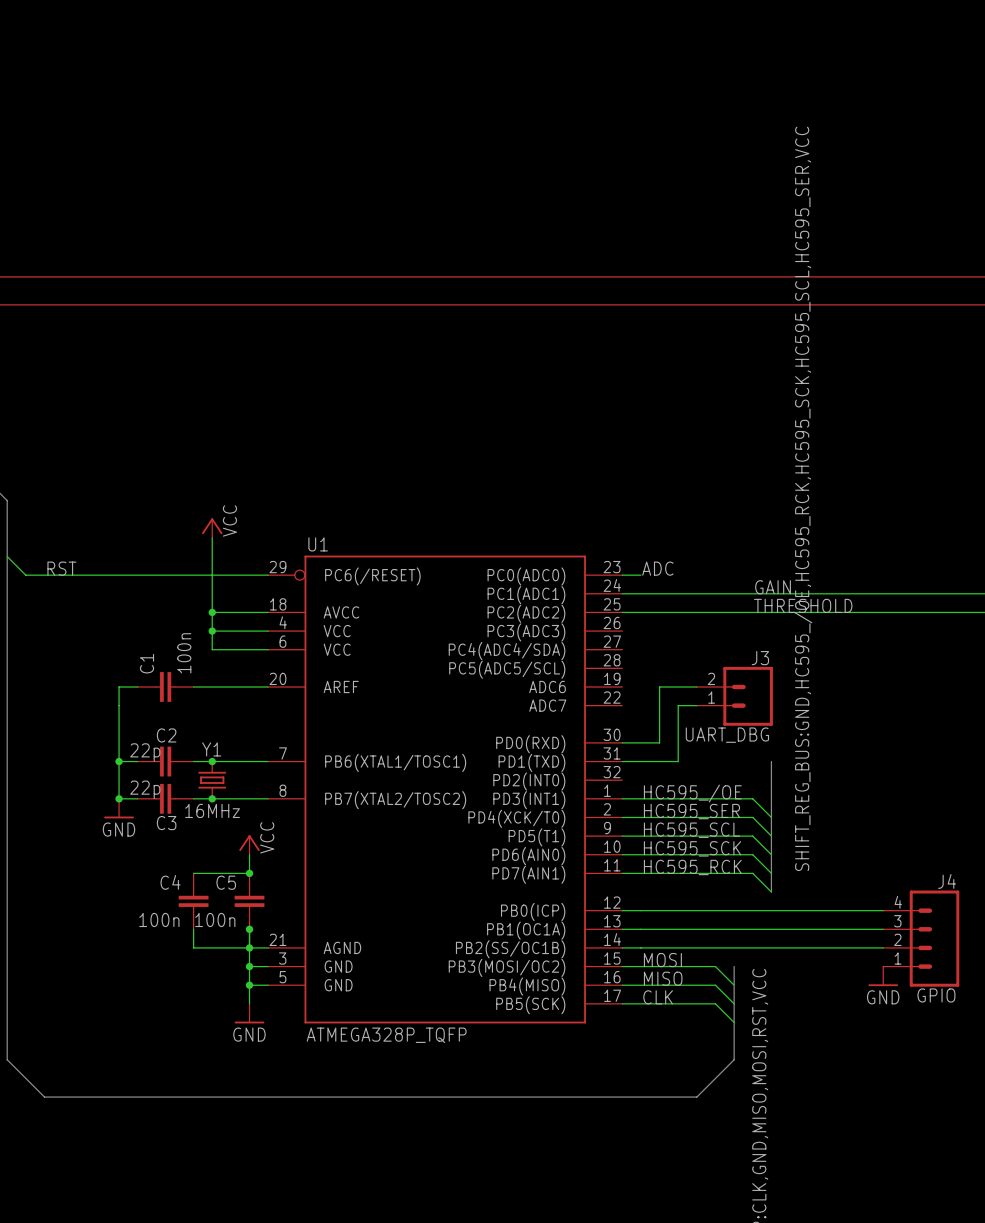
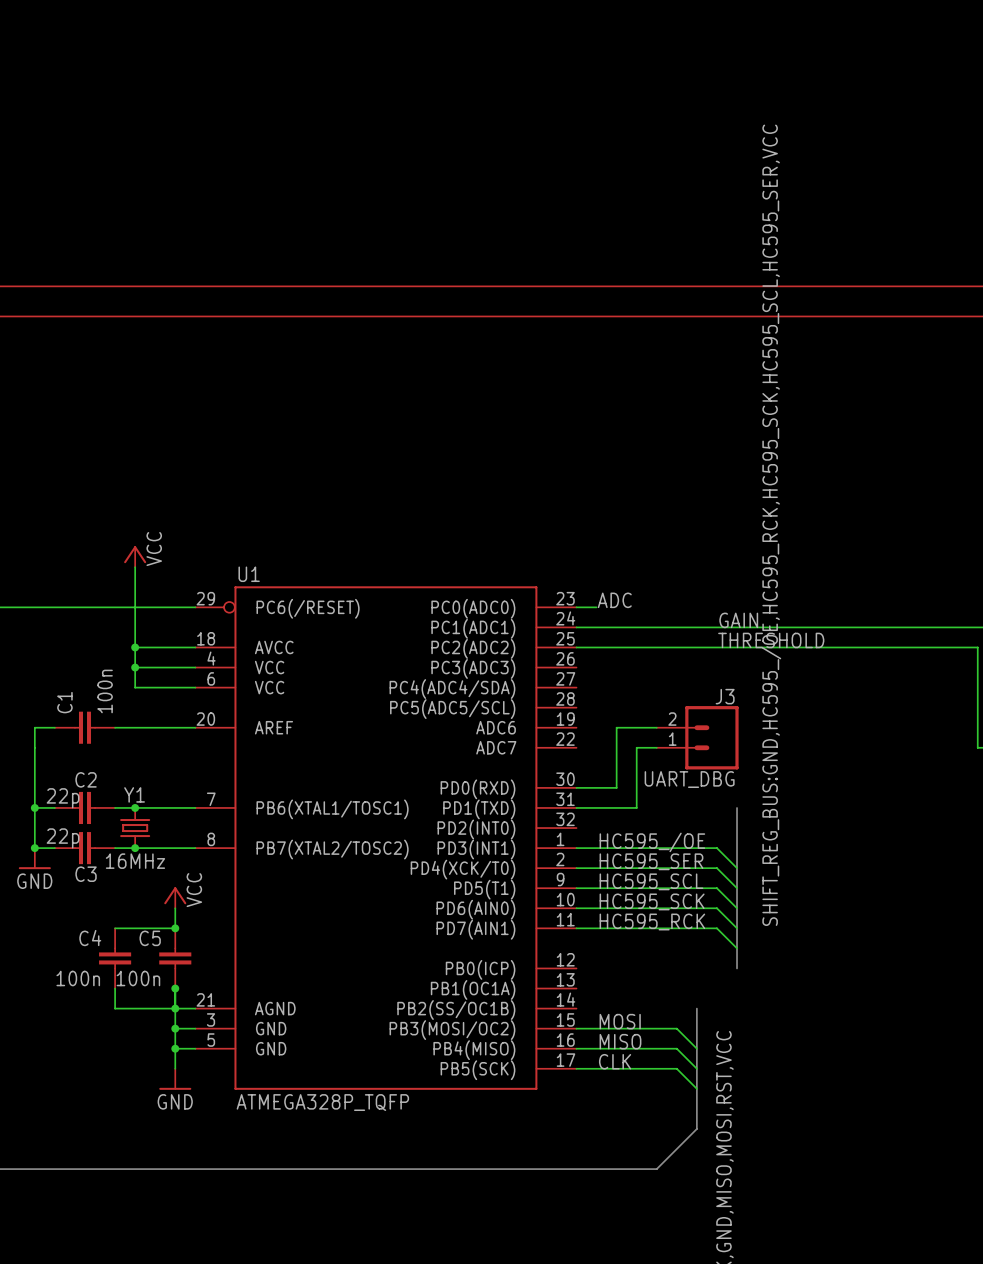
bus: none -> (737, 948) (737, 968)
wire: (622, 910) (883, 910) -> none
wire: (622, 929) (883, 929) -> none
J4: GPIO (921, 938) -> none
wire: (622, 947) (883, 947) -> none
bus: none -> (696, 1008) (696, 1028)
power symbol: GND (883, 976) -> none

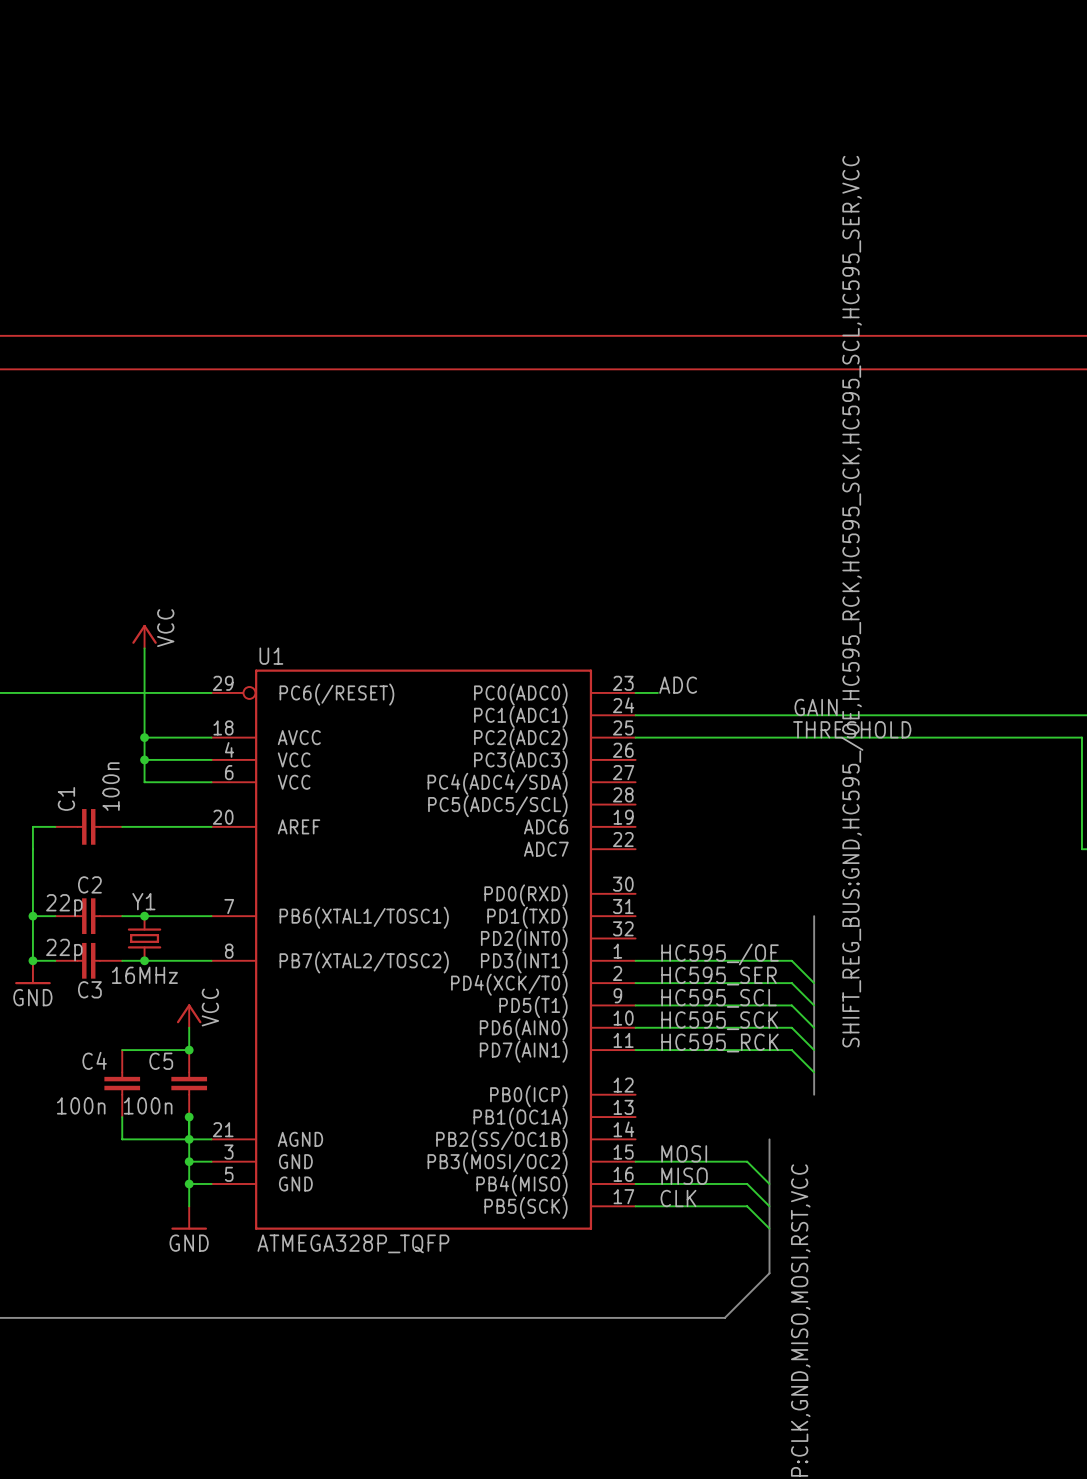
wire: (656, 727) (616, 727) (616, 787) (576, 787) -> none
J3: UART_DBG (697, 737) -> none
wire: (656, 747) (636, 747) (636, 807) (576, 807) -> none

